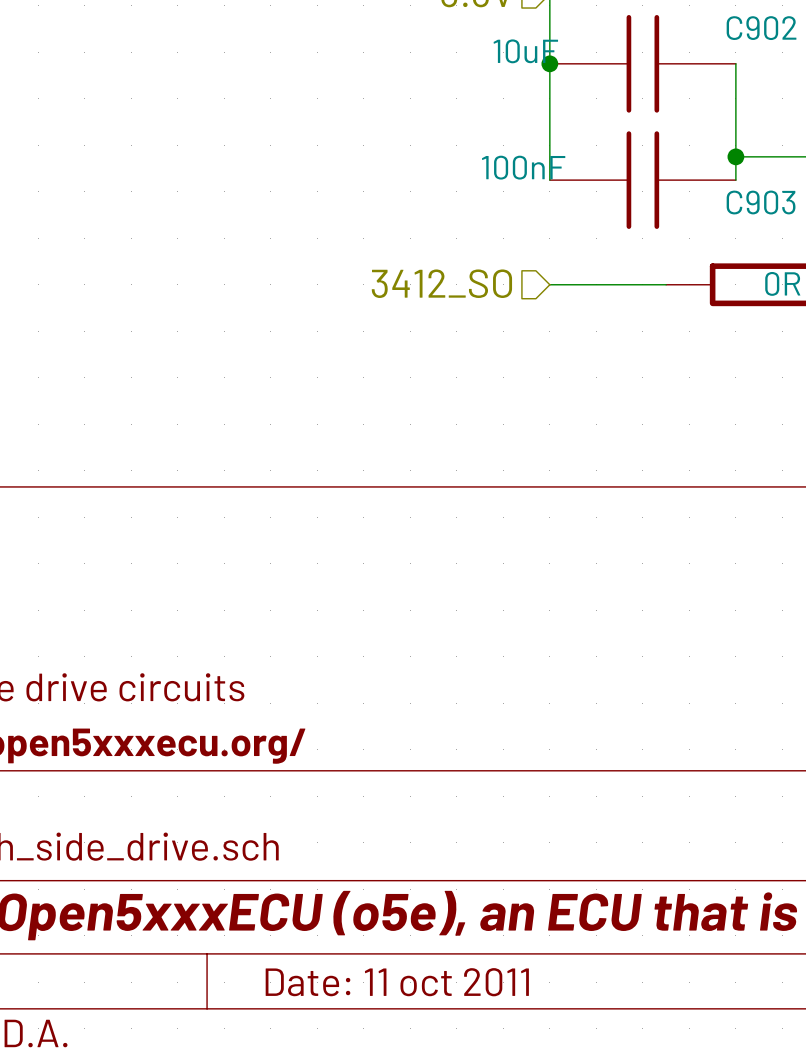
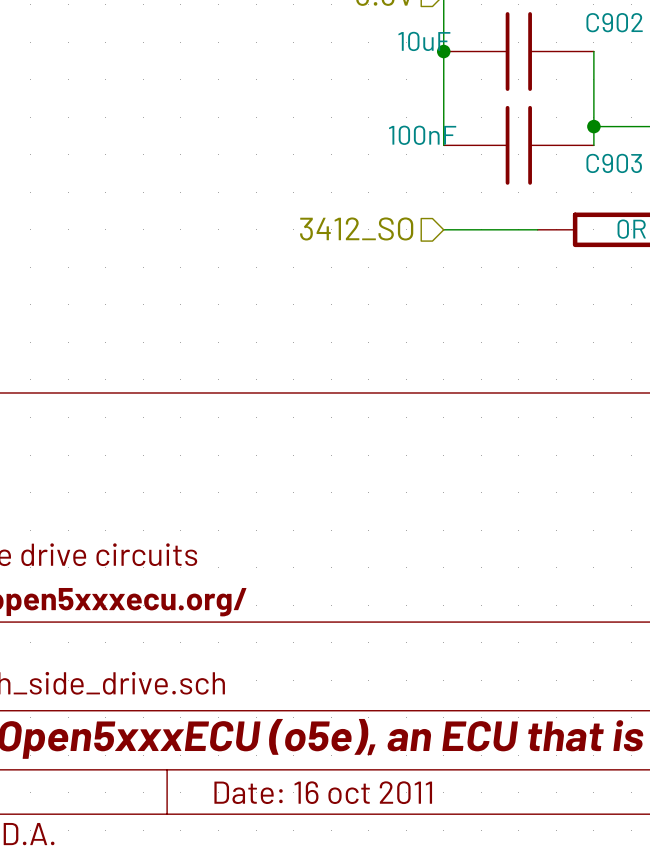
title block: Date: 11 oct 2011 (397, 982) -> Date: 16 oct 2011 (323, 792)

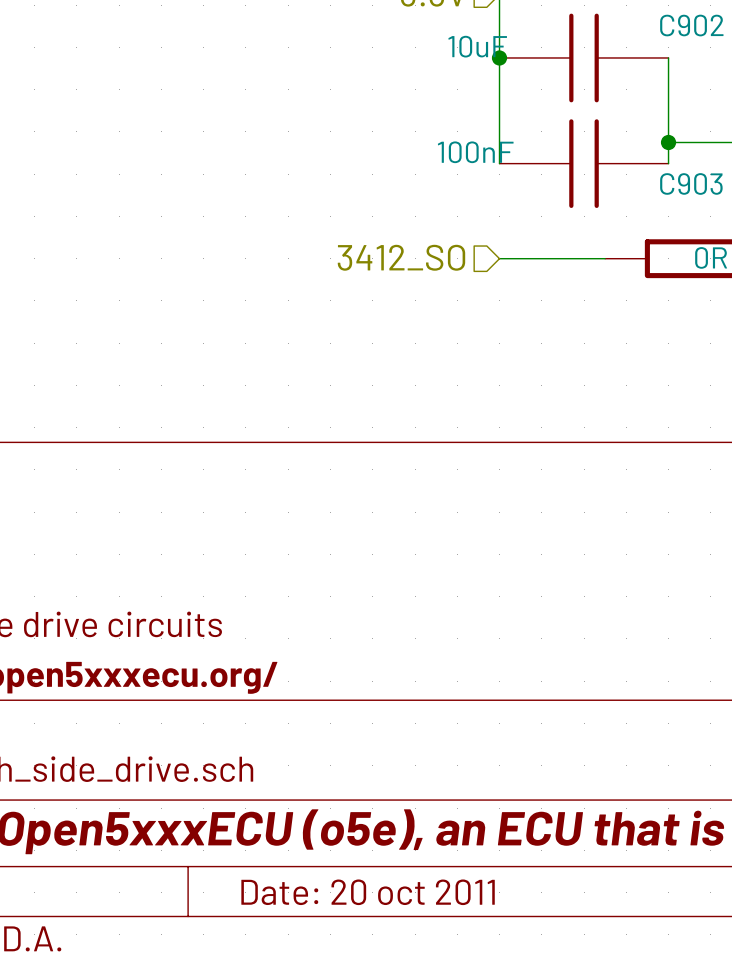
title block: Date: 16 oct 2011 (323, 792) -> Date: 20 oct 2011 (368, 892)

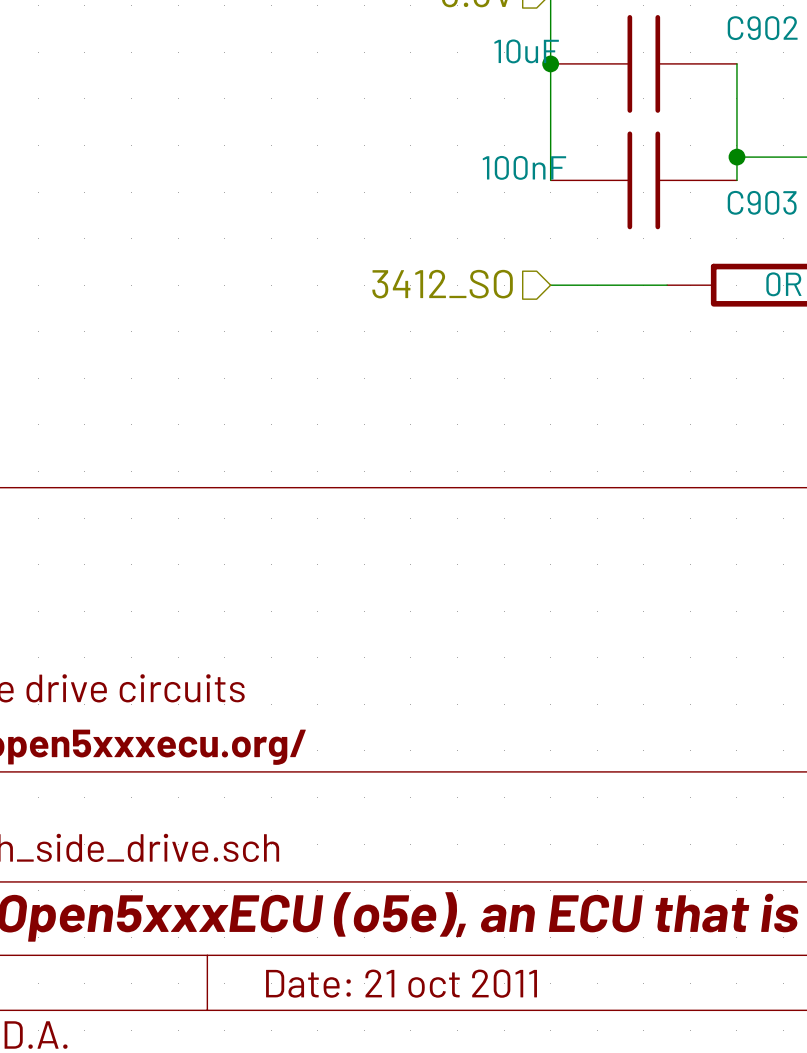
title block: Date: 20 oct 2011 (368, 892) -> Date: 21 oct 2011 (401, 983)

